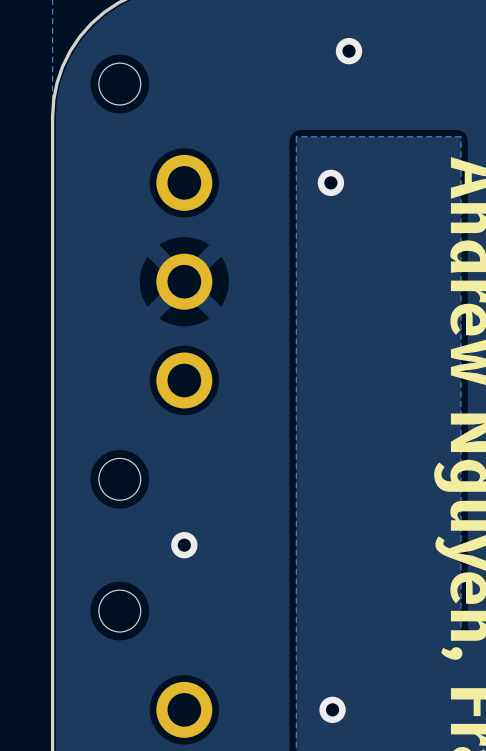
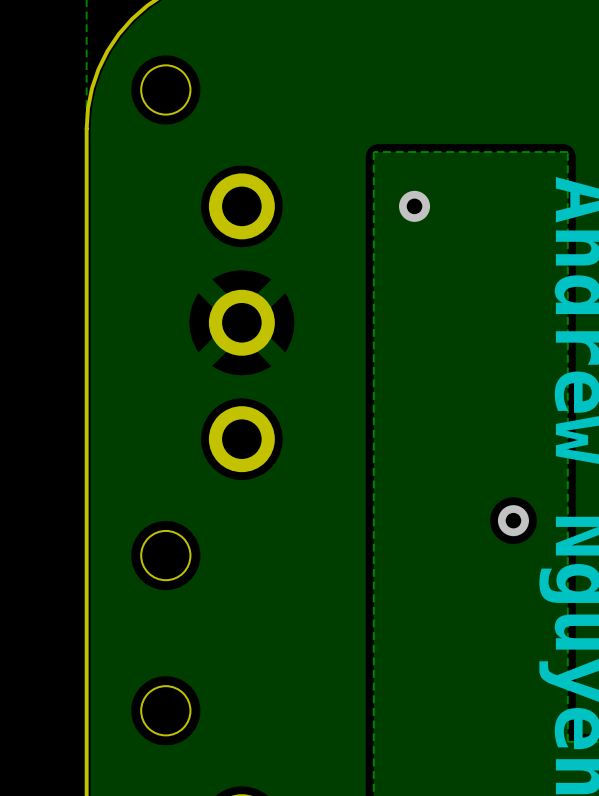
via: (349, 51) -> none
via: none -> (513, 520)
via: (184, 545) -> none

